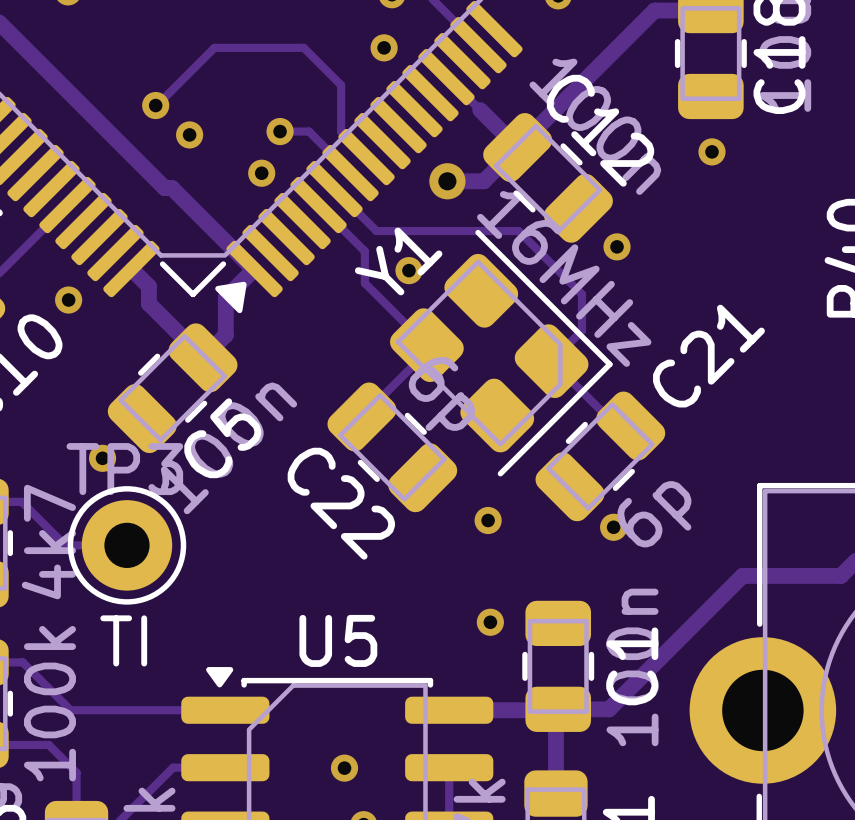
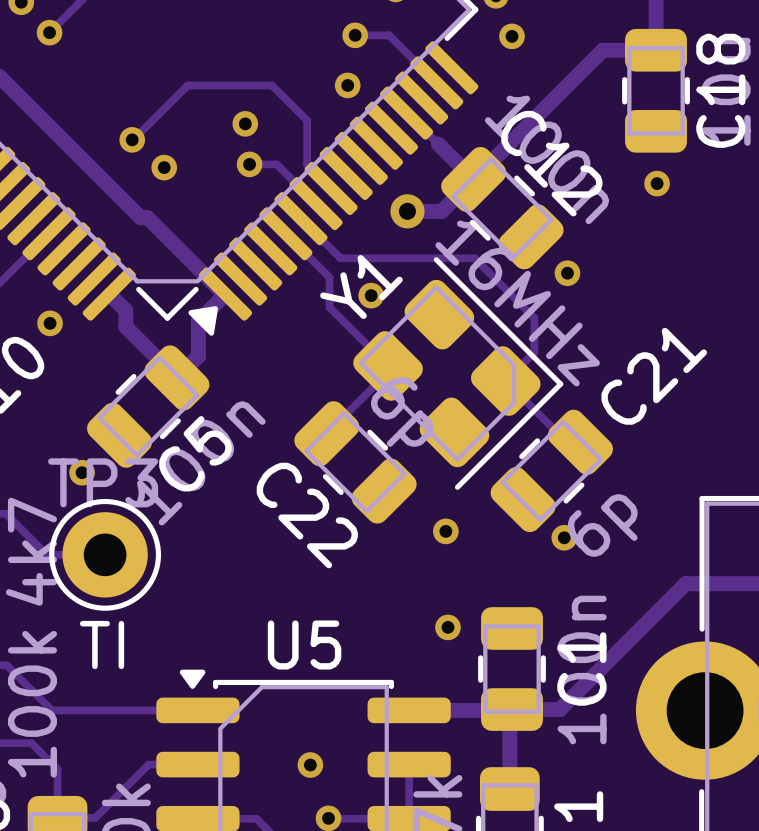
via position: (261, 173) -> (245, 123)

